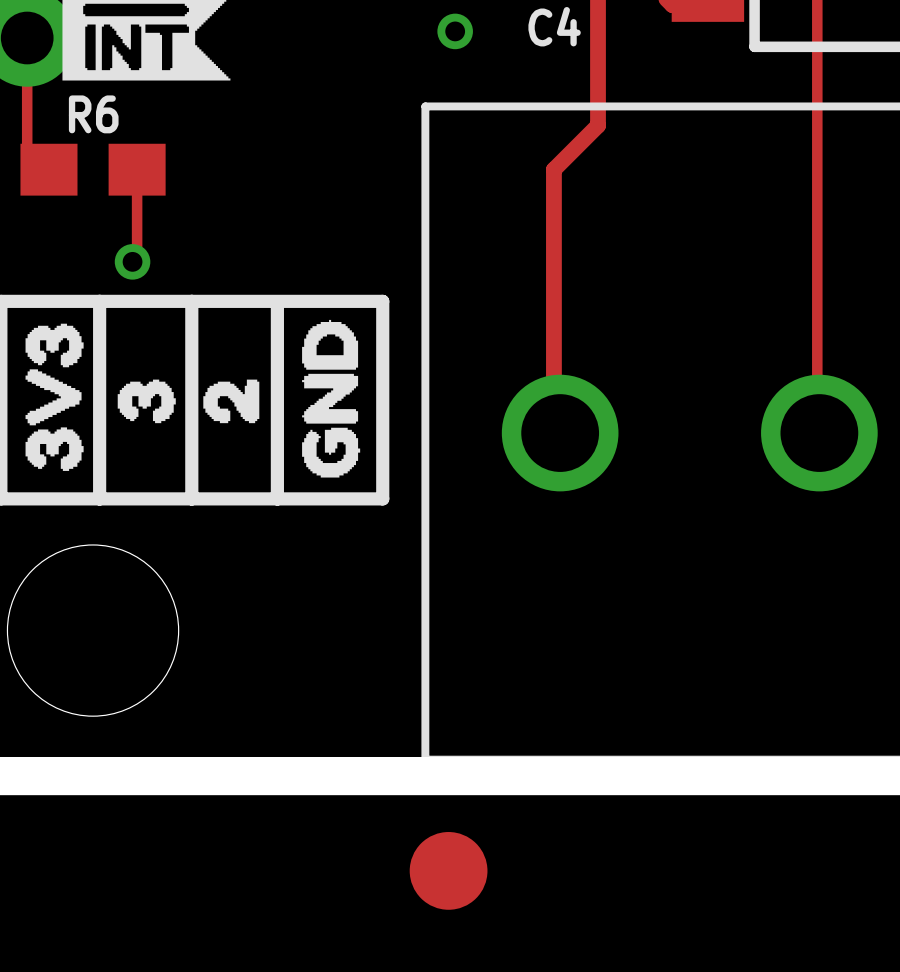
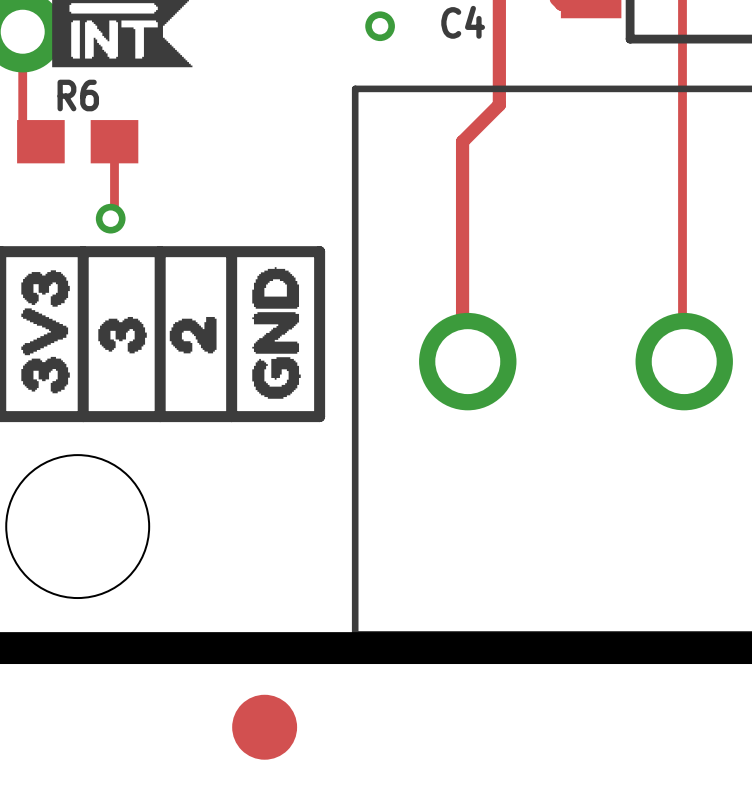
part position: (448, 870) -> (264, 727)

